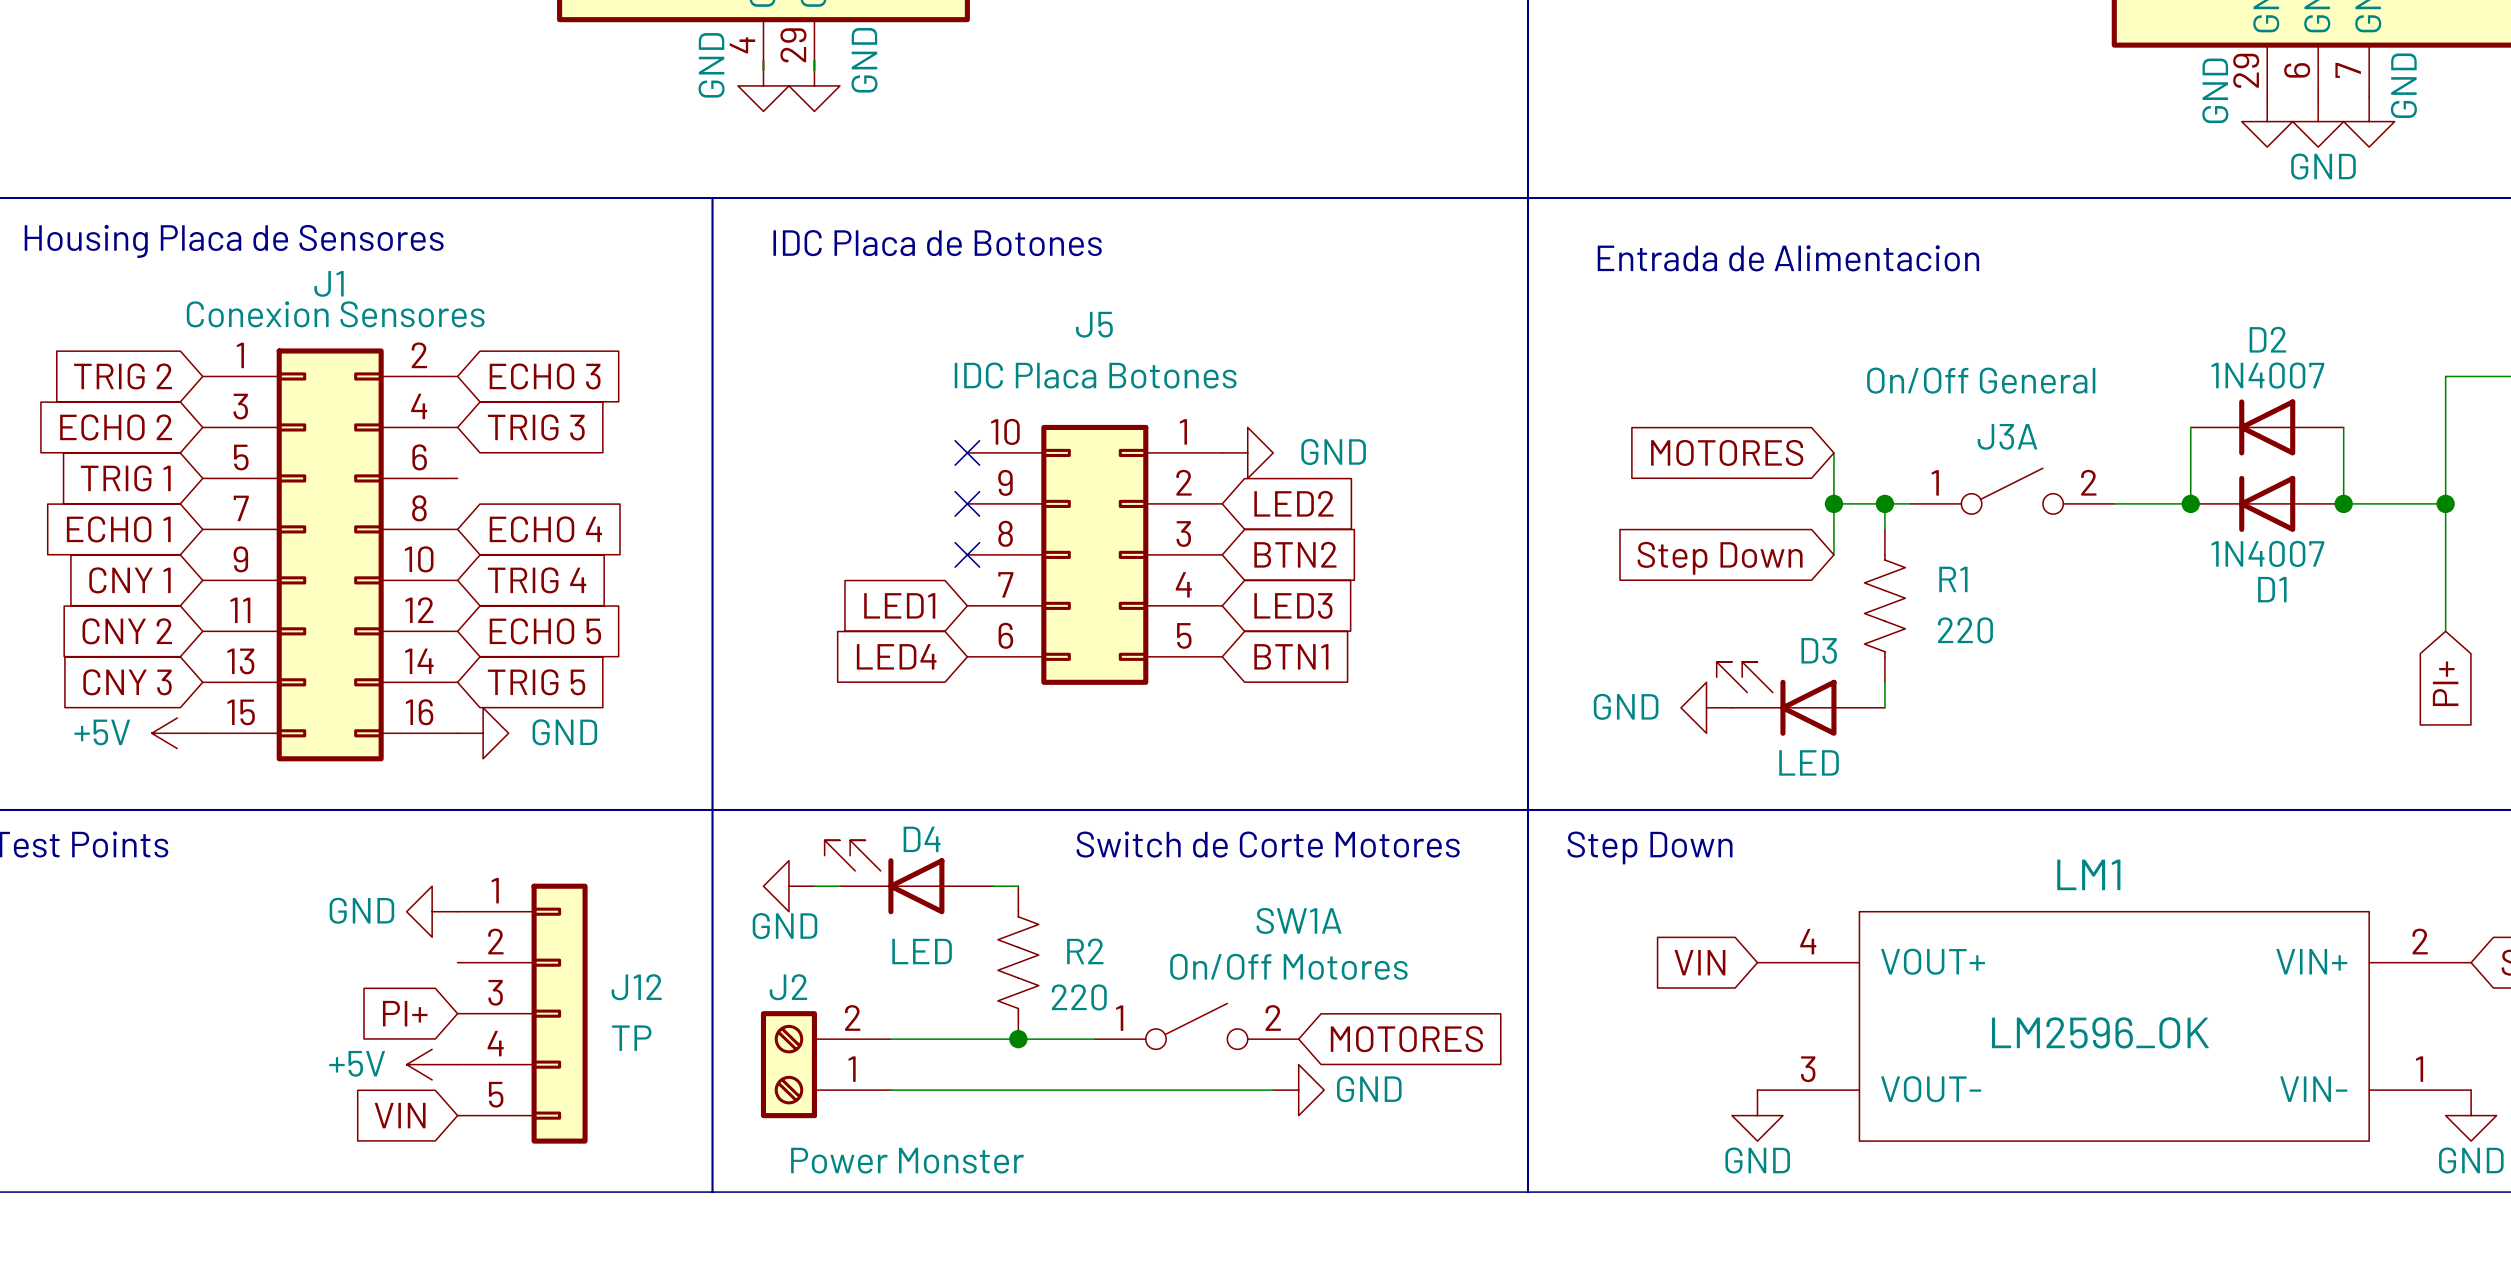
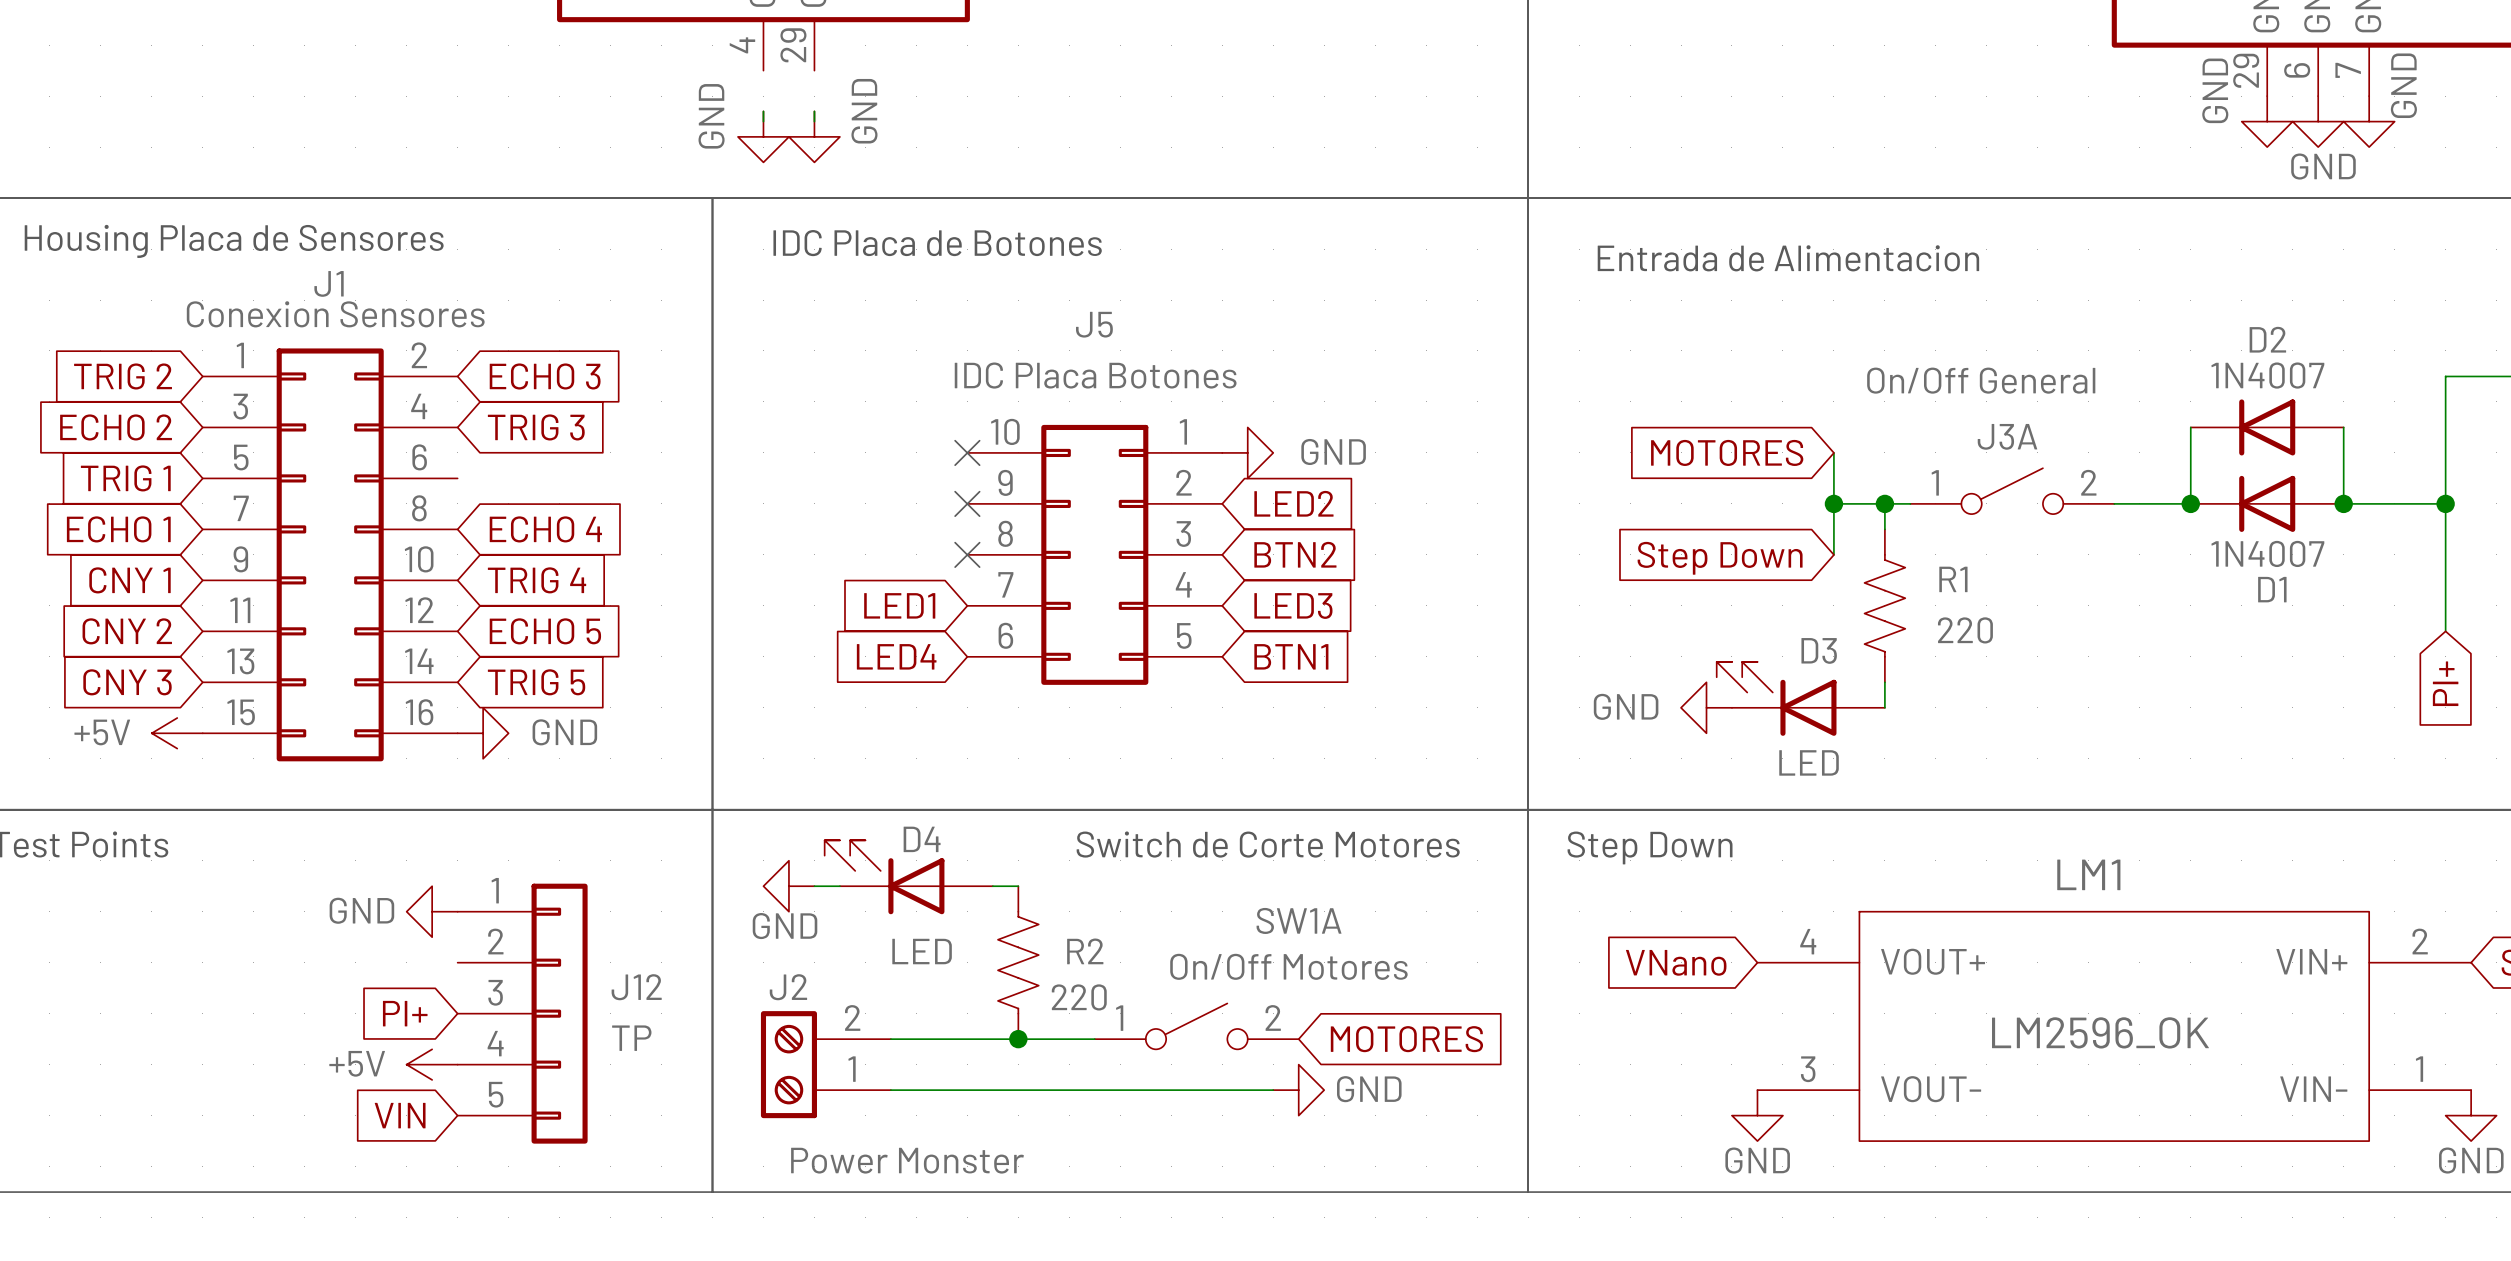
power symbol: GND (763, 85) -> none
power symbol: GND (814, 85) -> none
power symbol: none -> GND (763, 136)
power symbol: none -> GND (814, 136)
global label: VIN (1699, 962) -> VNano (1676, 962)

